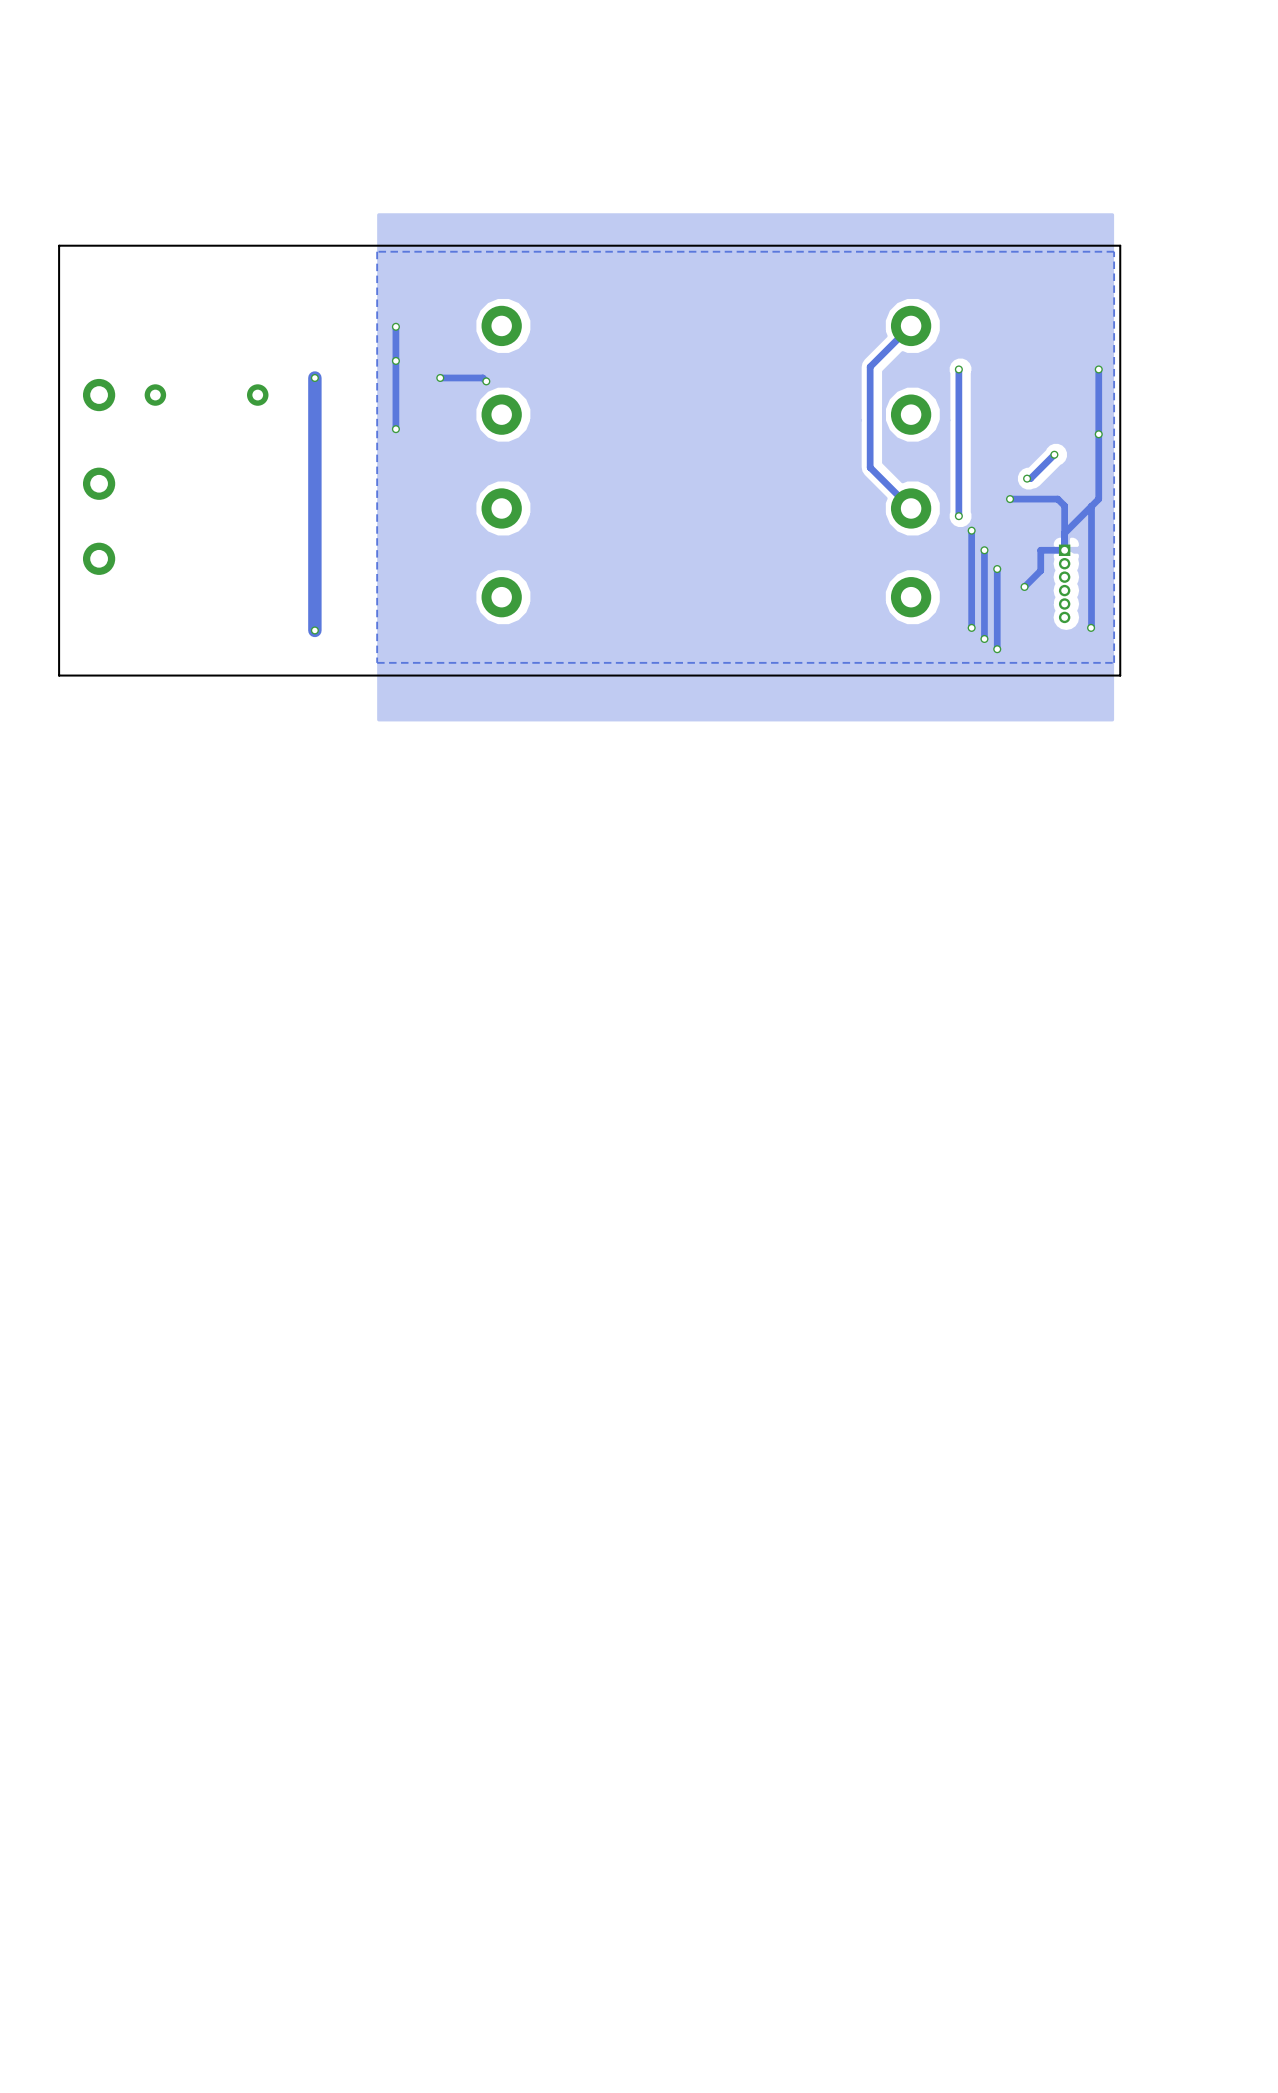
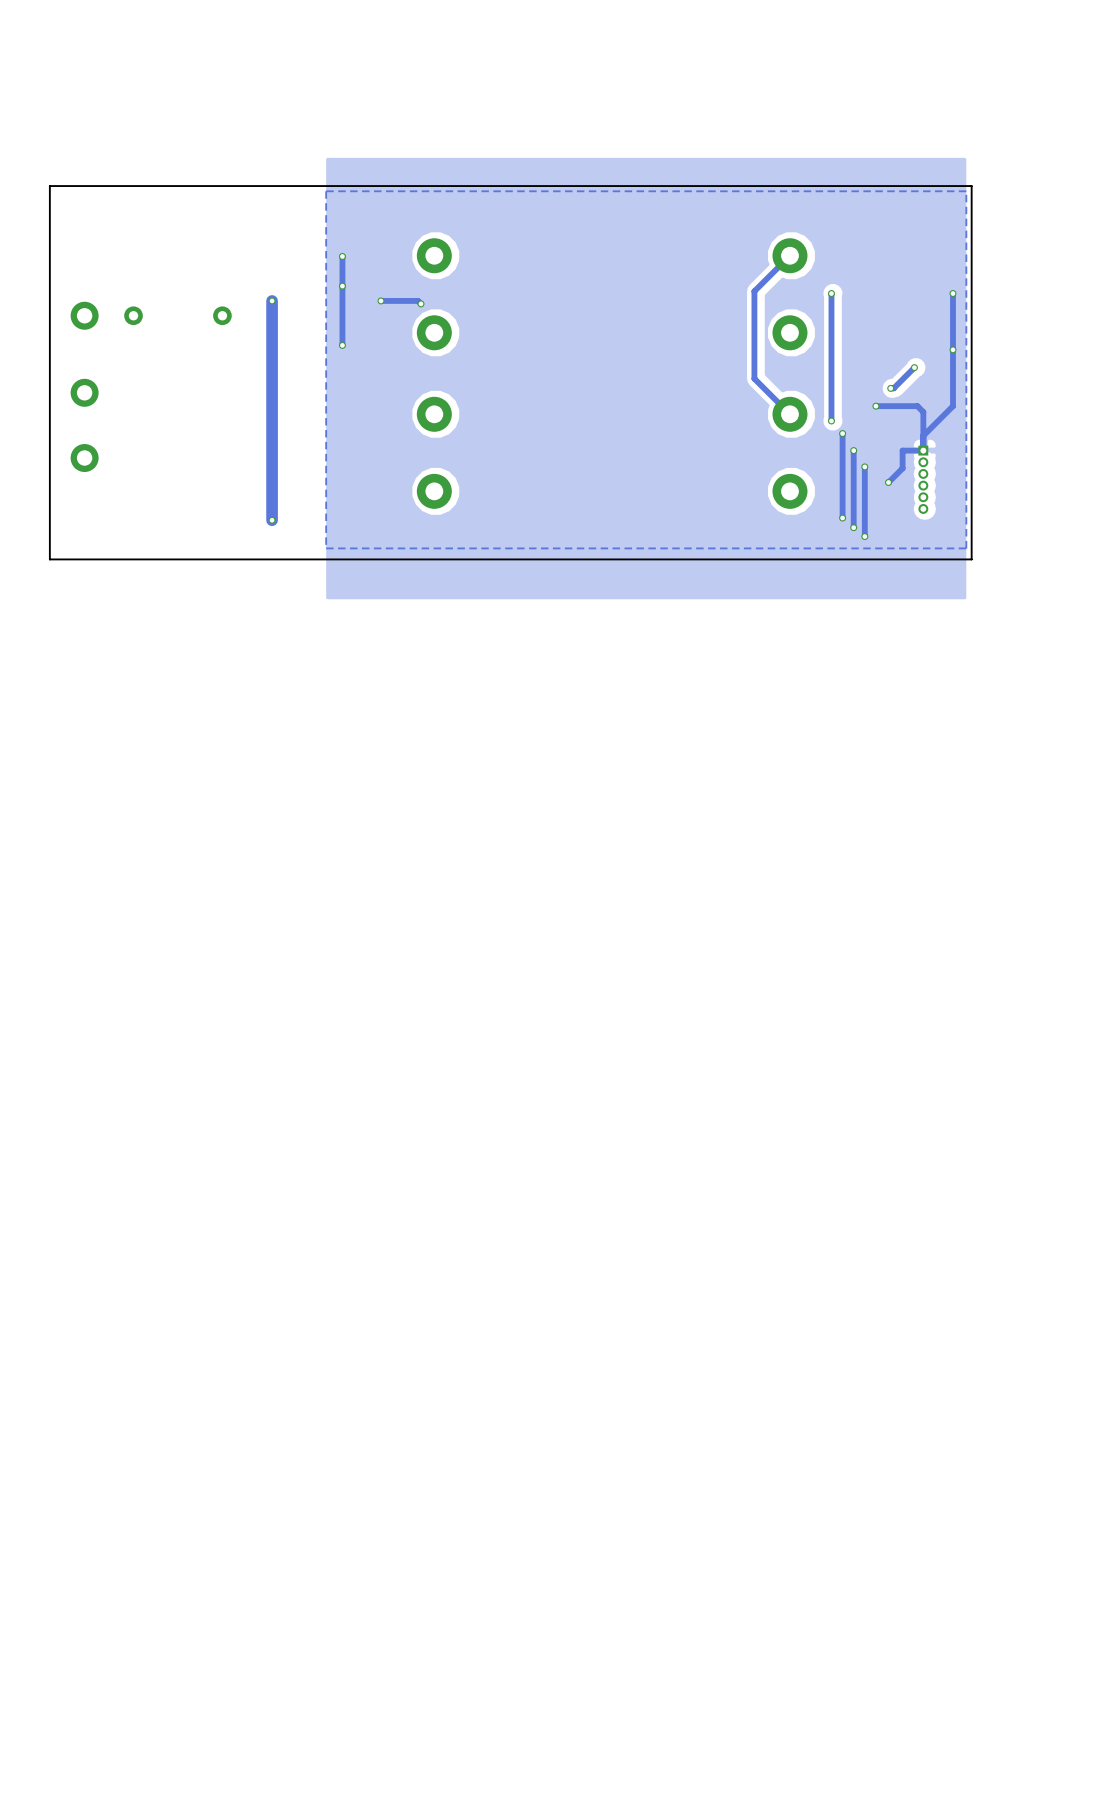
track: (1091, 506) (1091, 627) -> none
via: (1091, 627) -> none

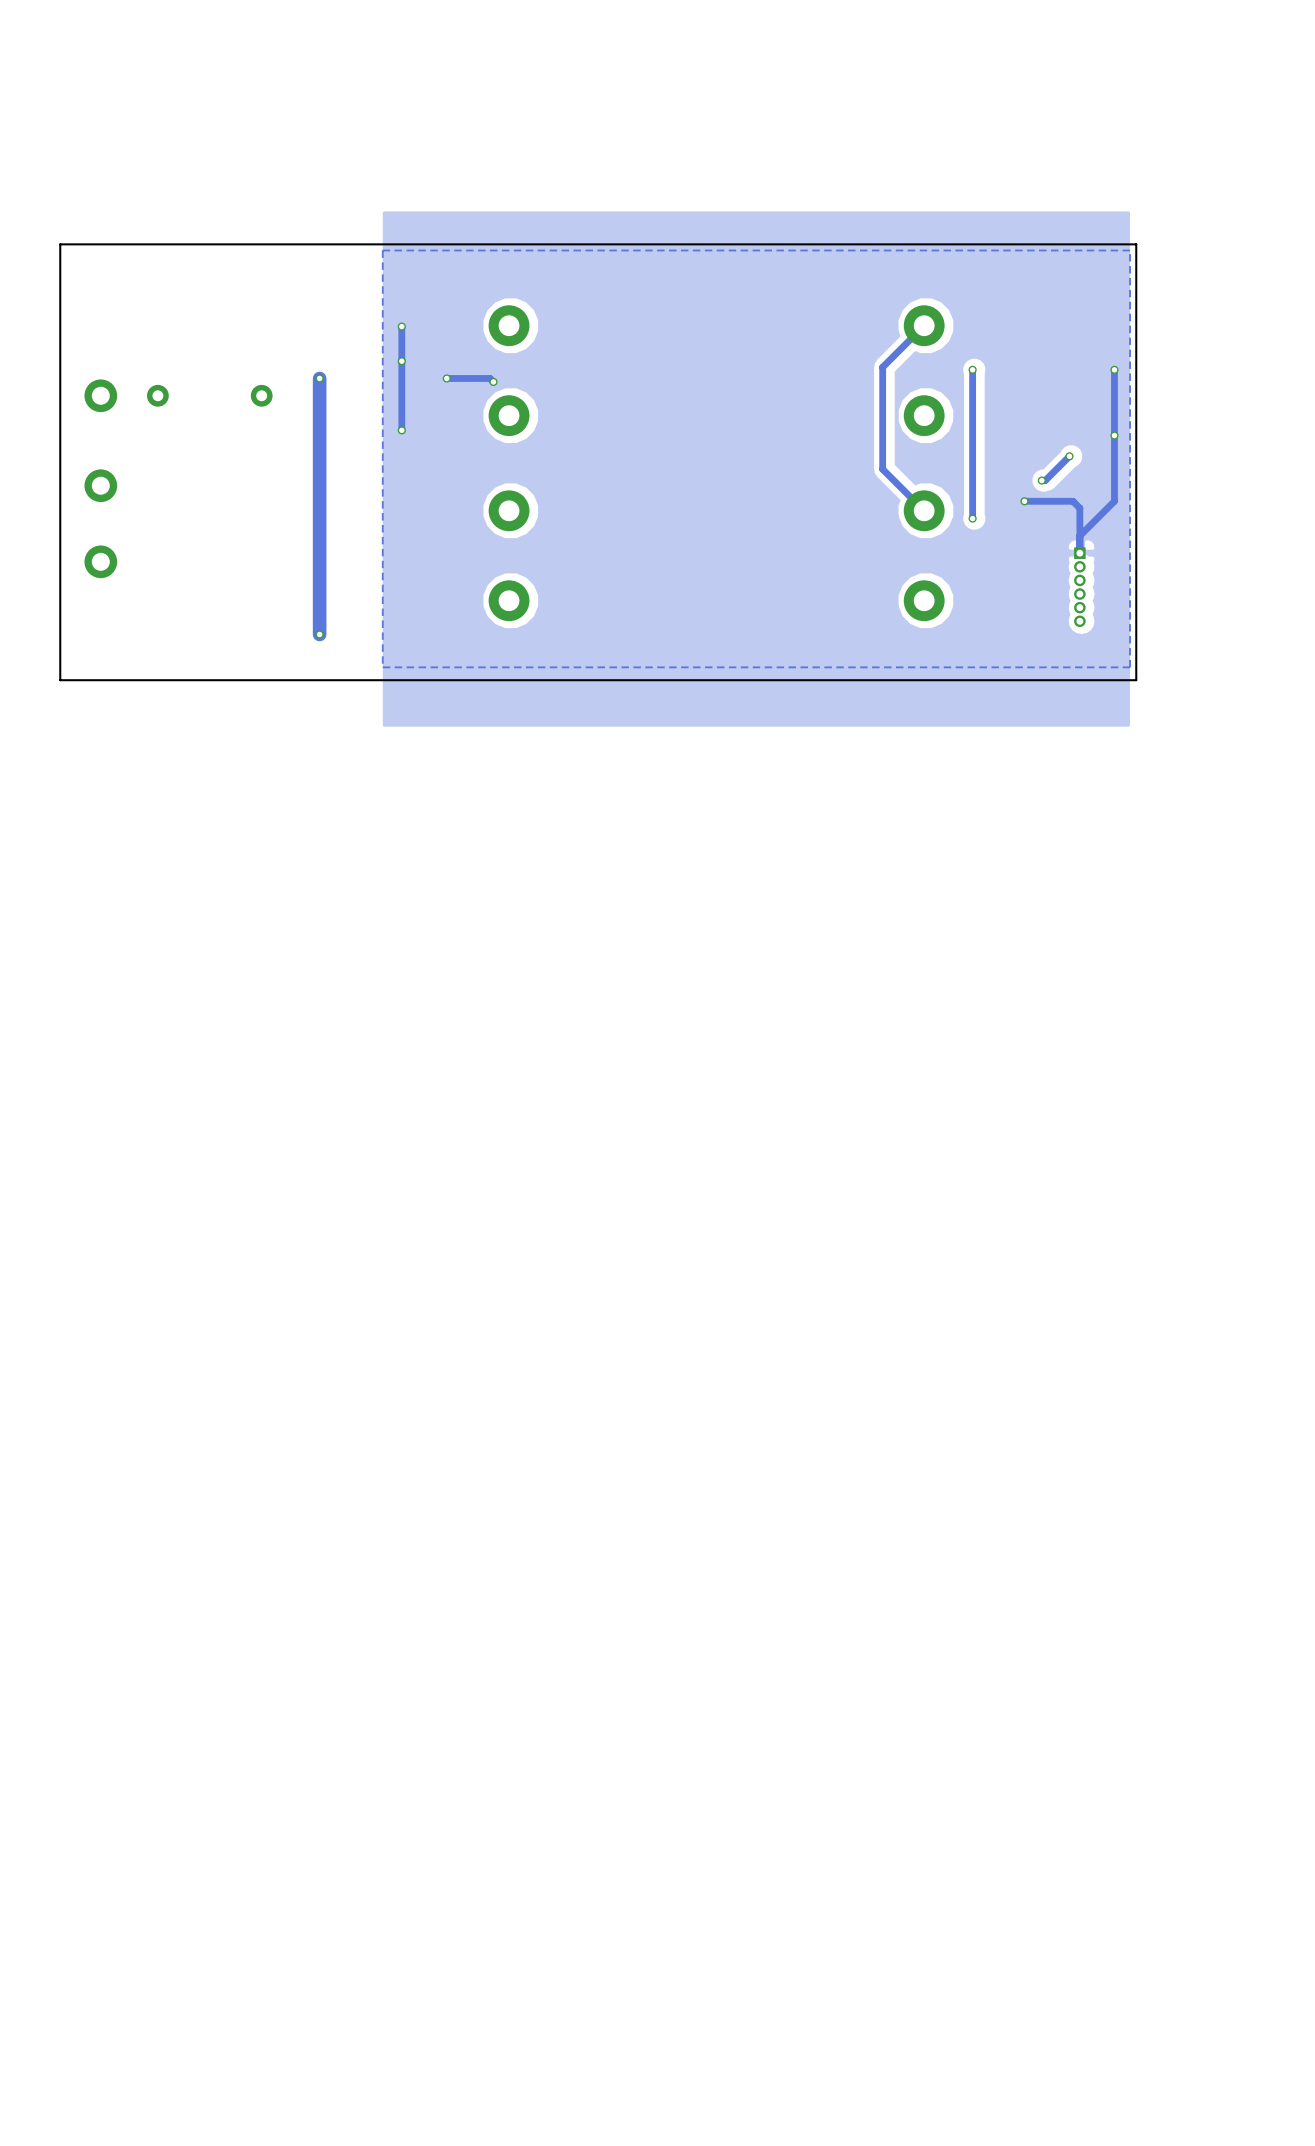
track: (842, 433) (842, 518) -> none
via: (842, 433) -> none
track: (853, 450) (853, 527) -> none
via: (853, 450) -> none
track: (923, 450) (902, 450) (902, 468) (888, 482) -> none
track: (864, 466) (864, 536) -> none
via: (864, 466) -> none
via: (888, 482) -> none
via: (842, 518) -> none
via: (853, 527) -> none
via: (864, 536) -> none

